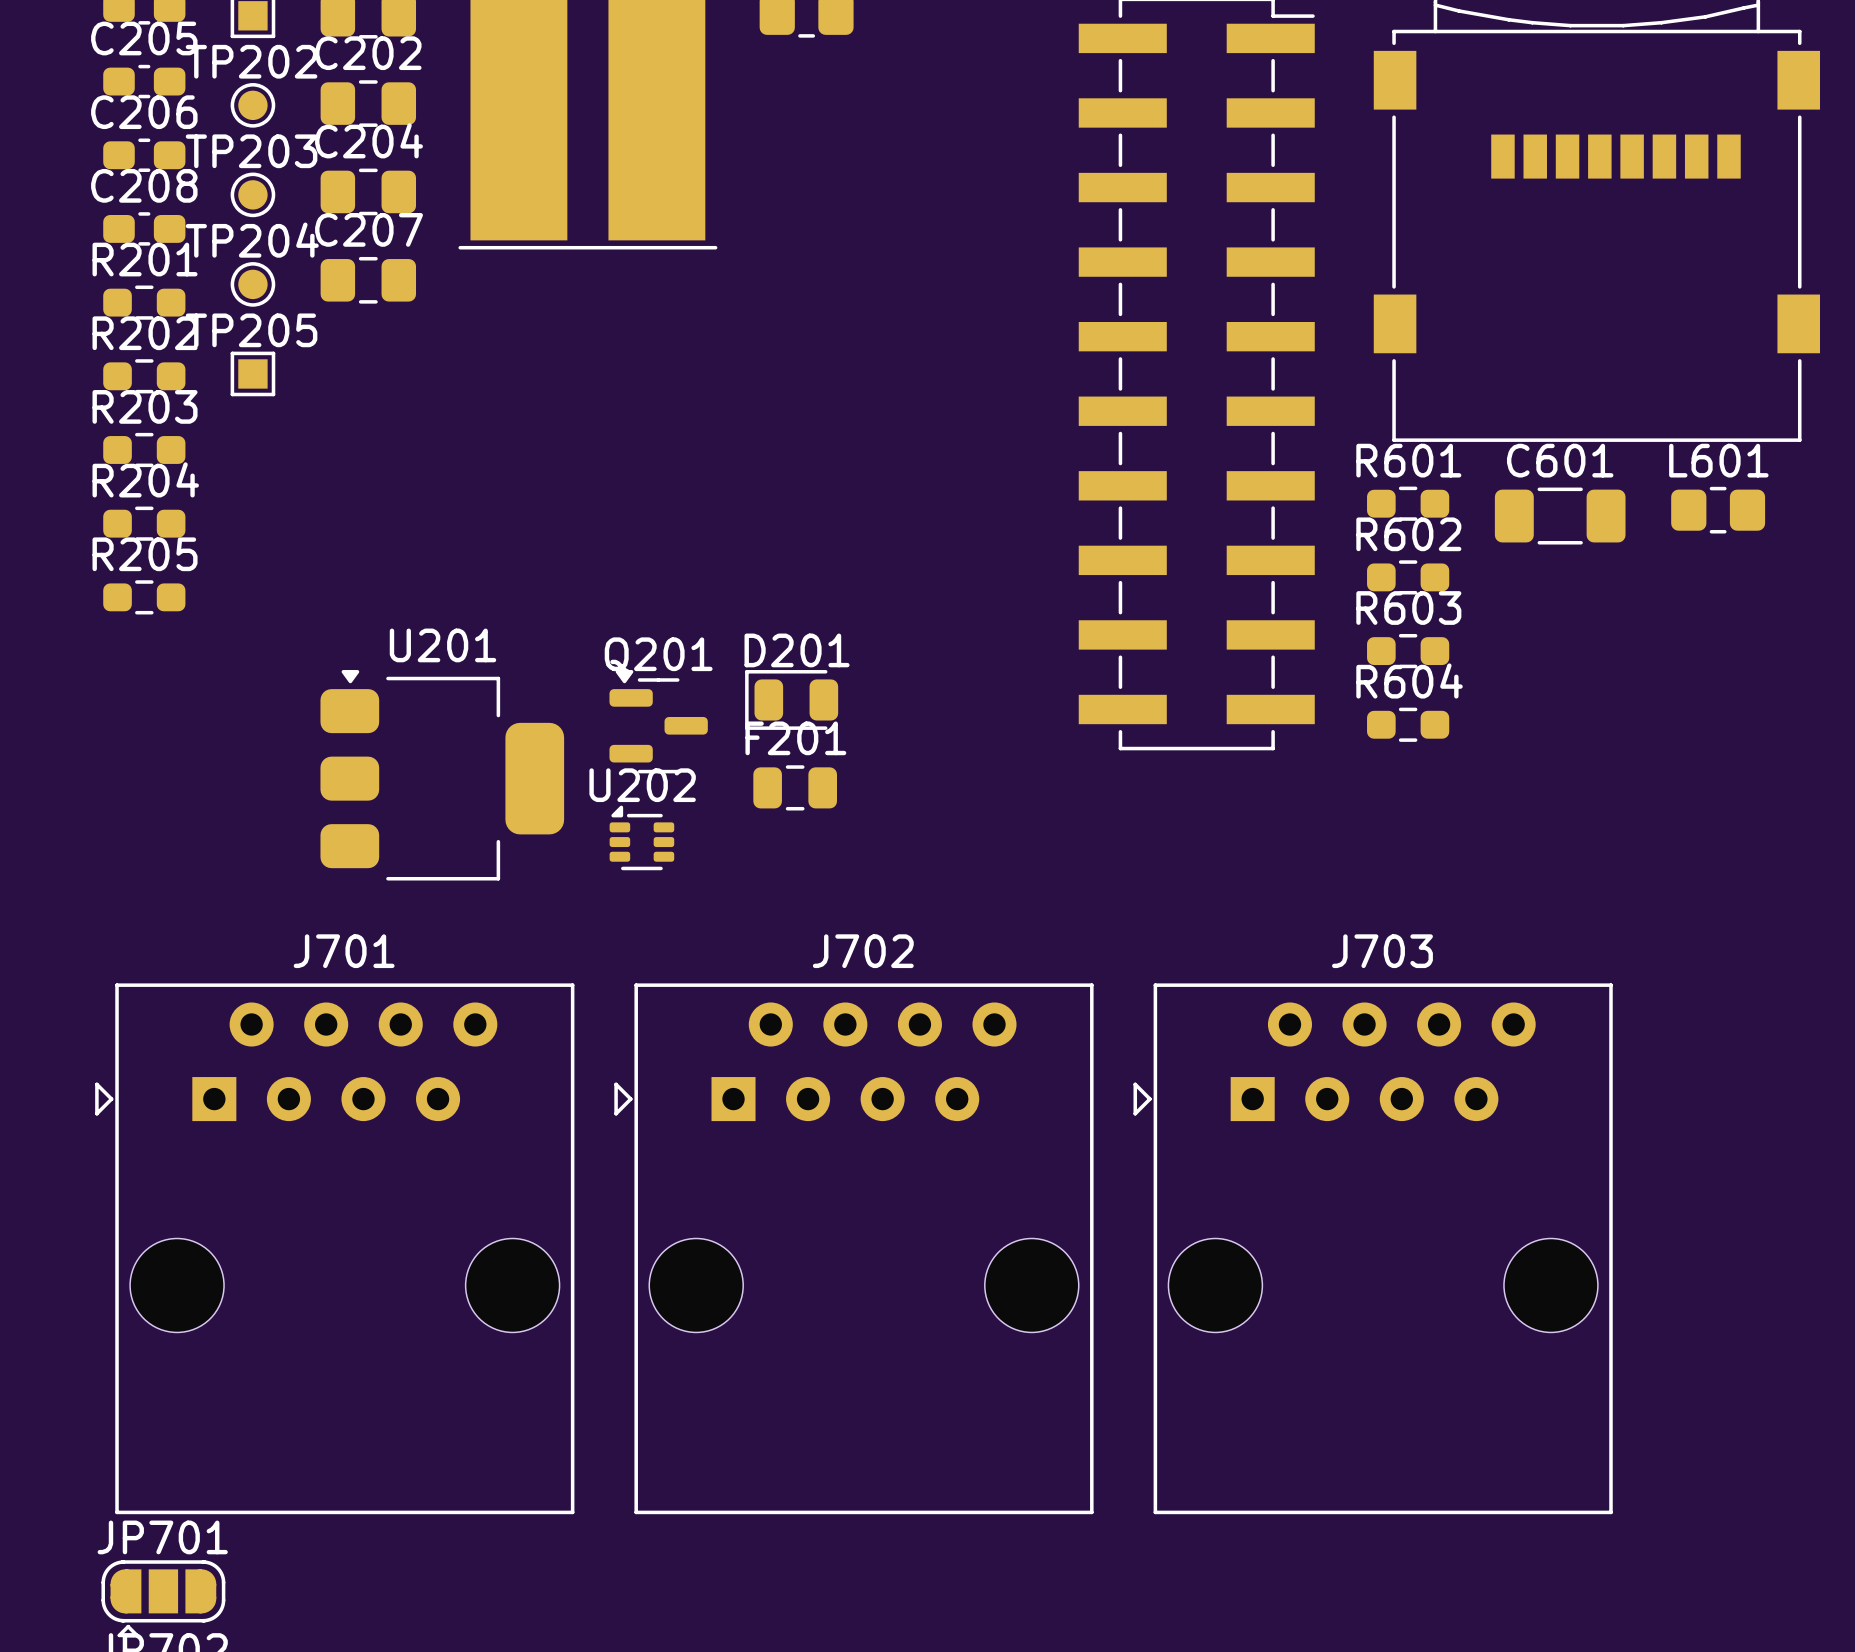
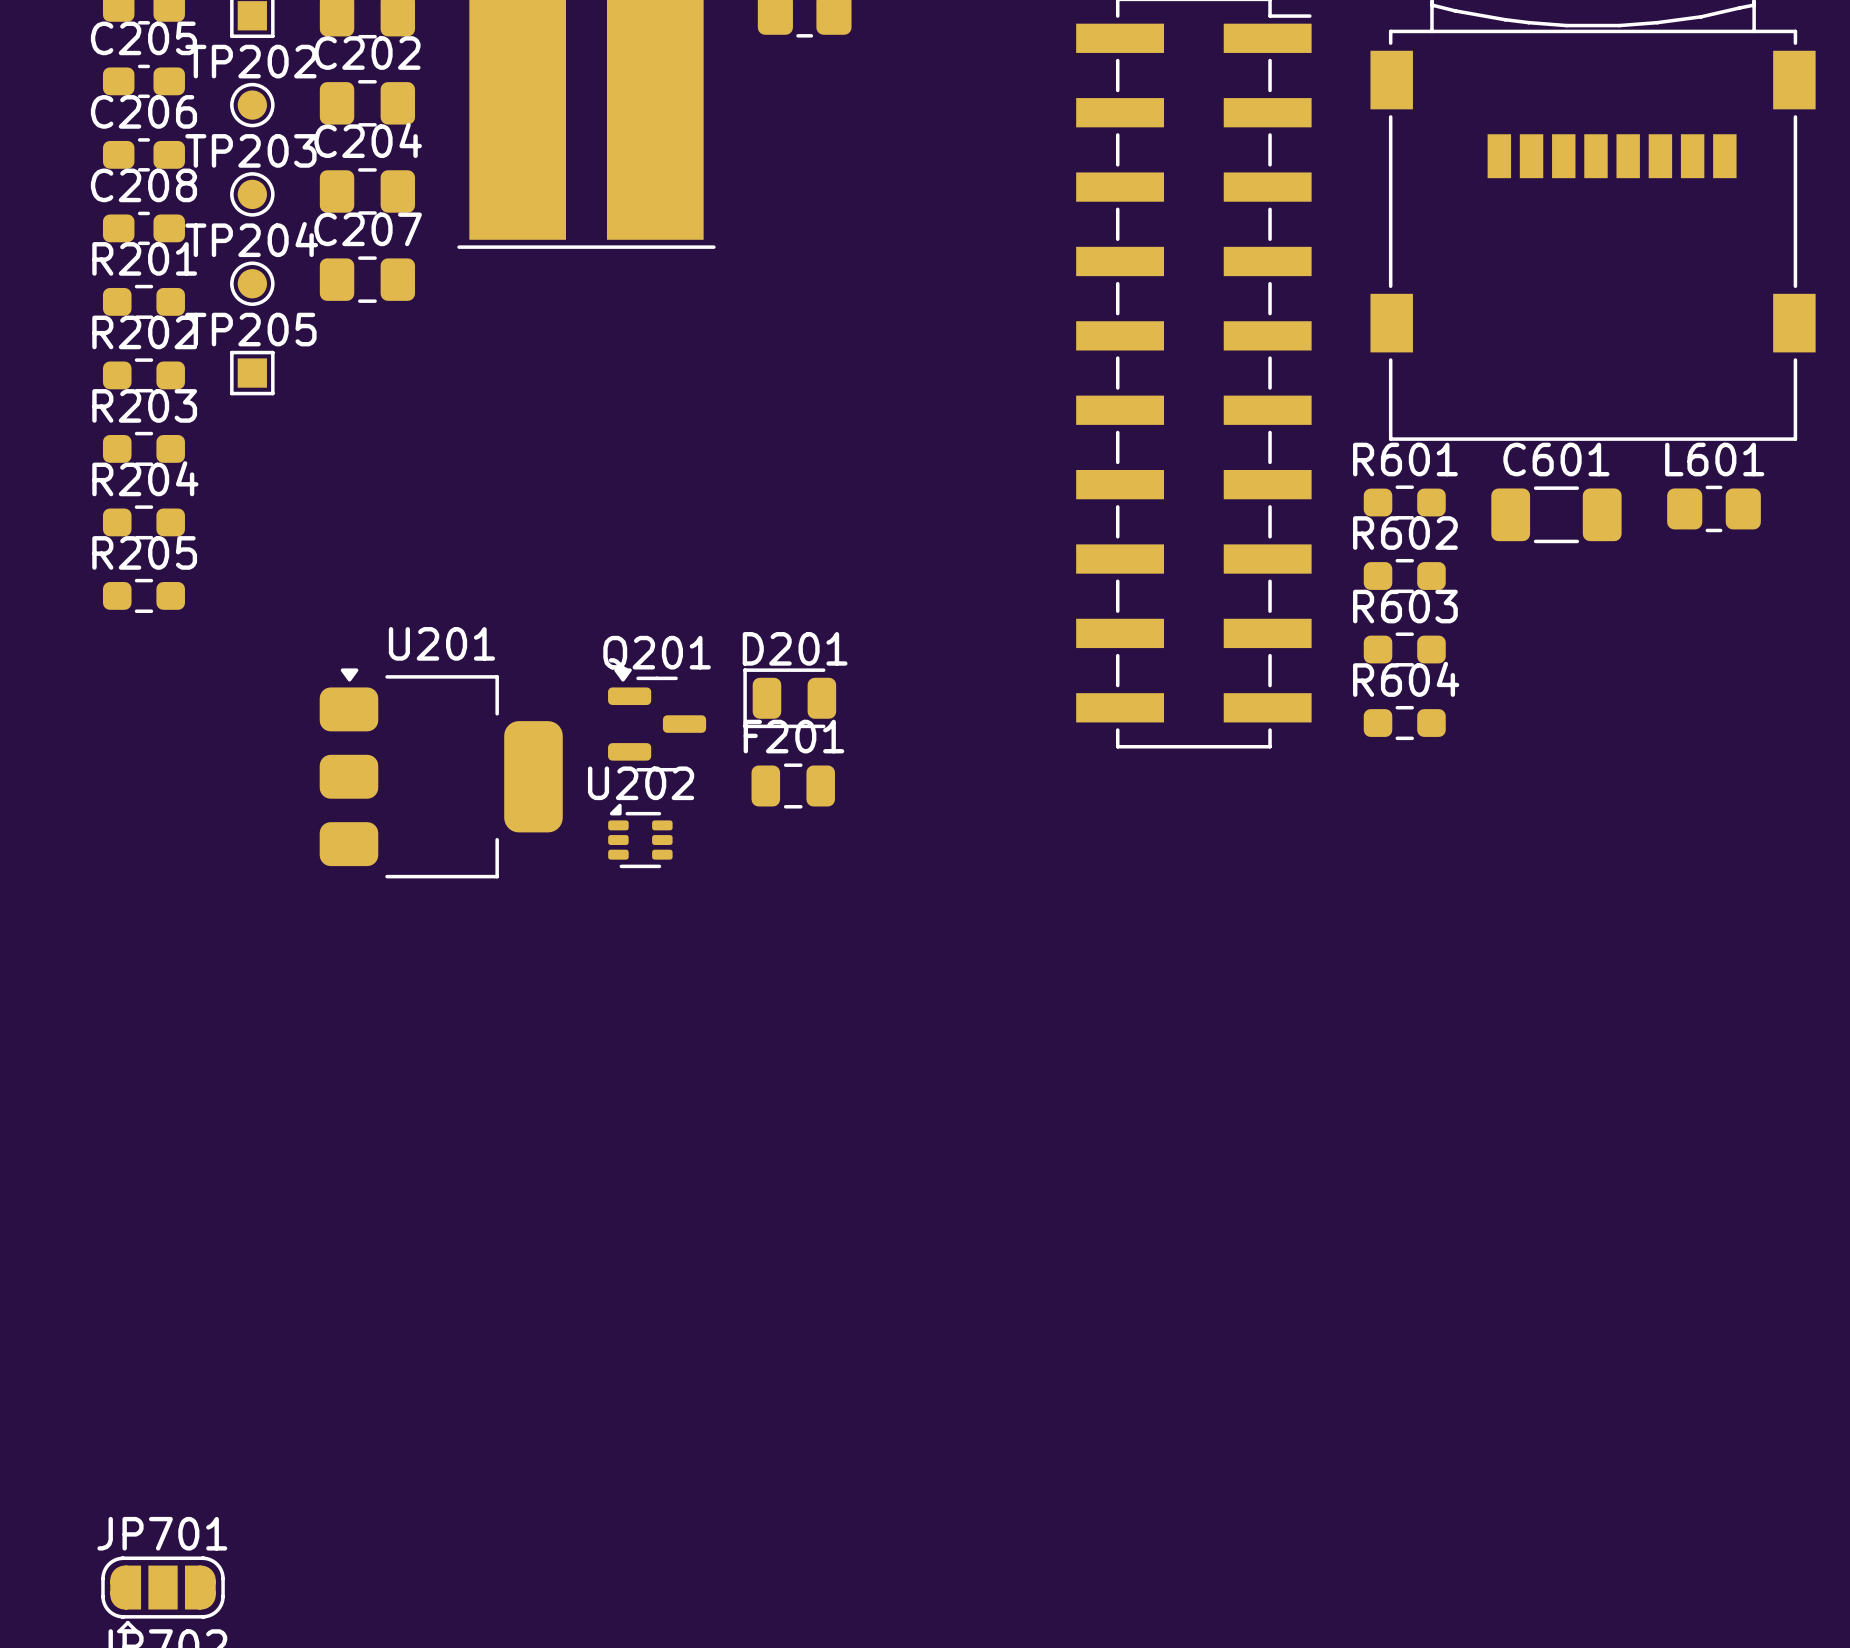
J701: (334, 1248) -> none
J702: (853, 1248) -> none
J703: (1373, 1248) -> none

